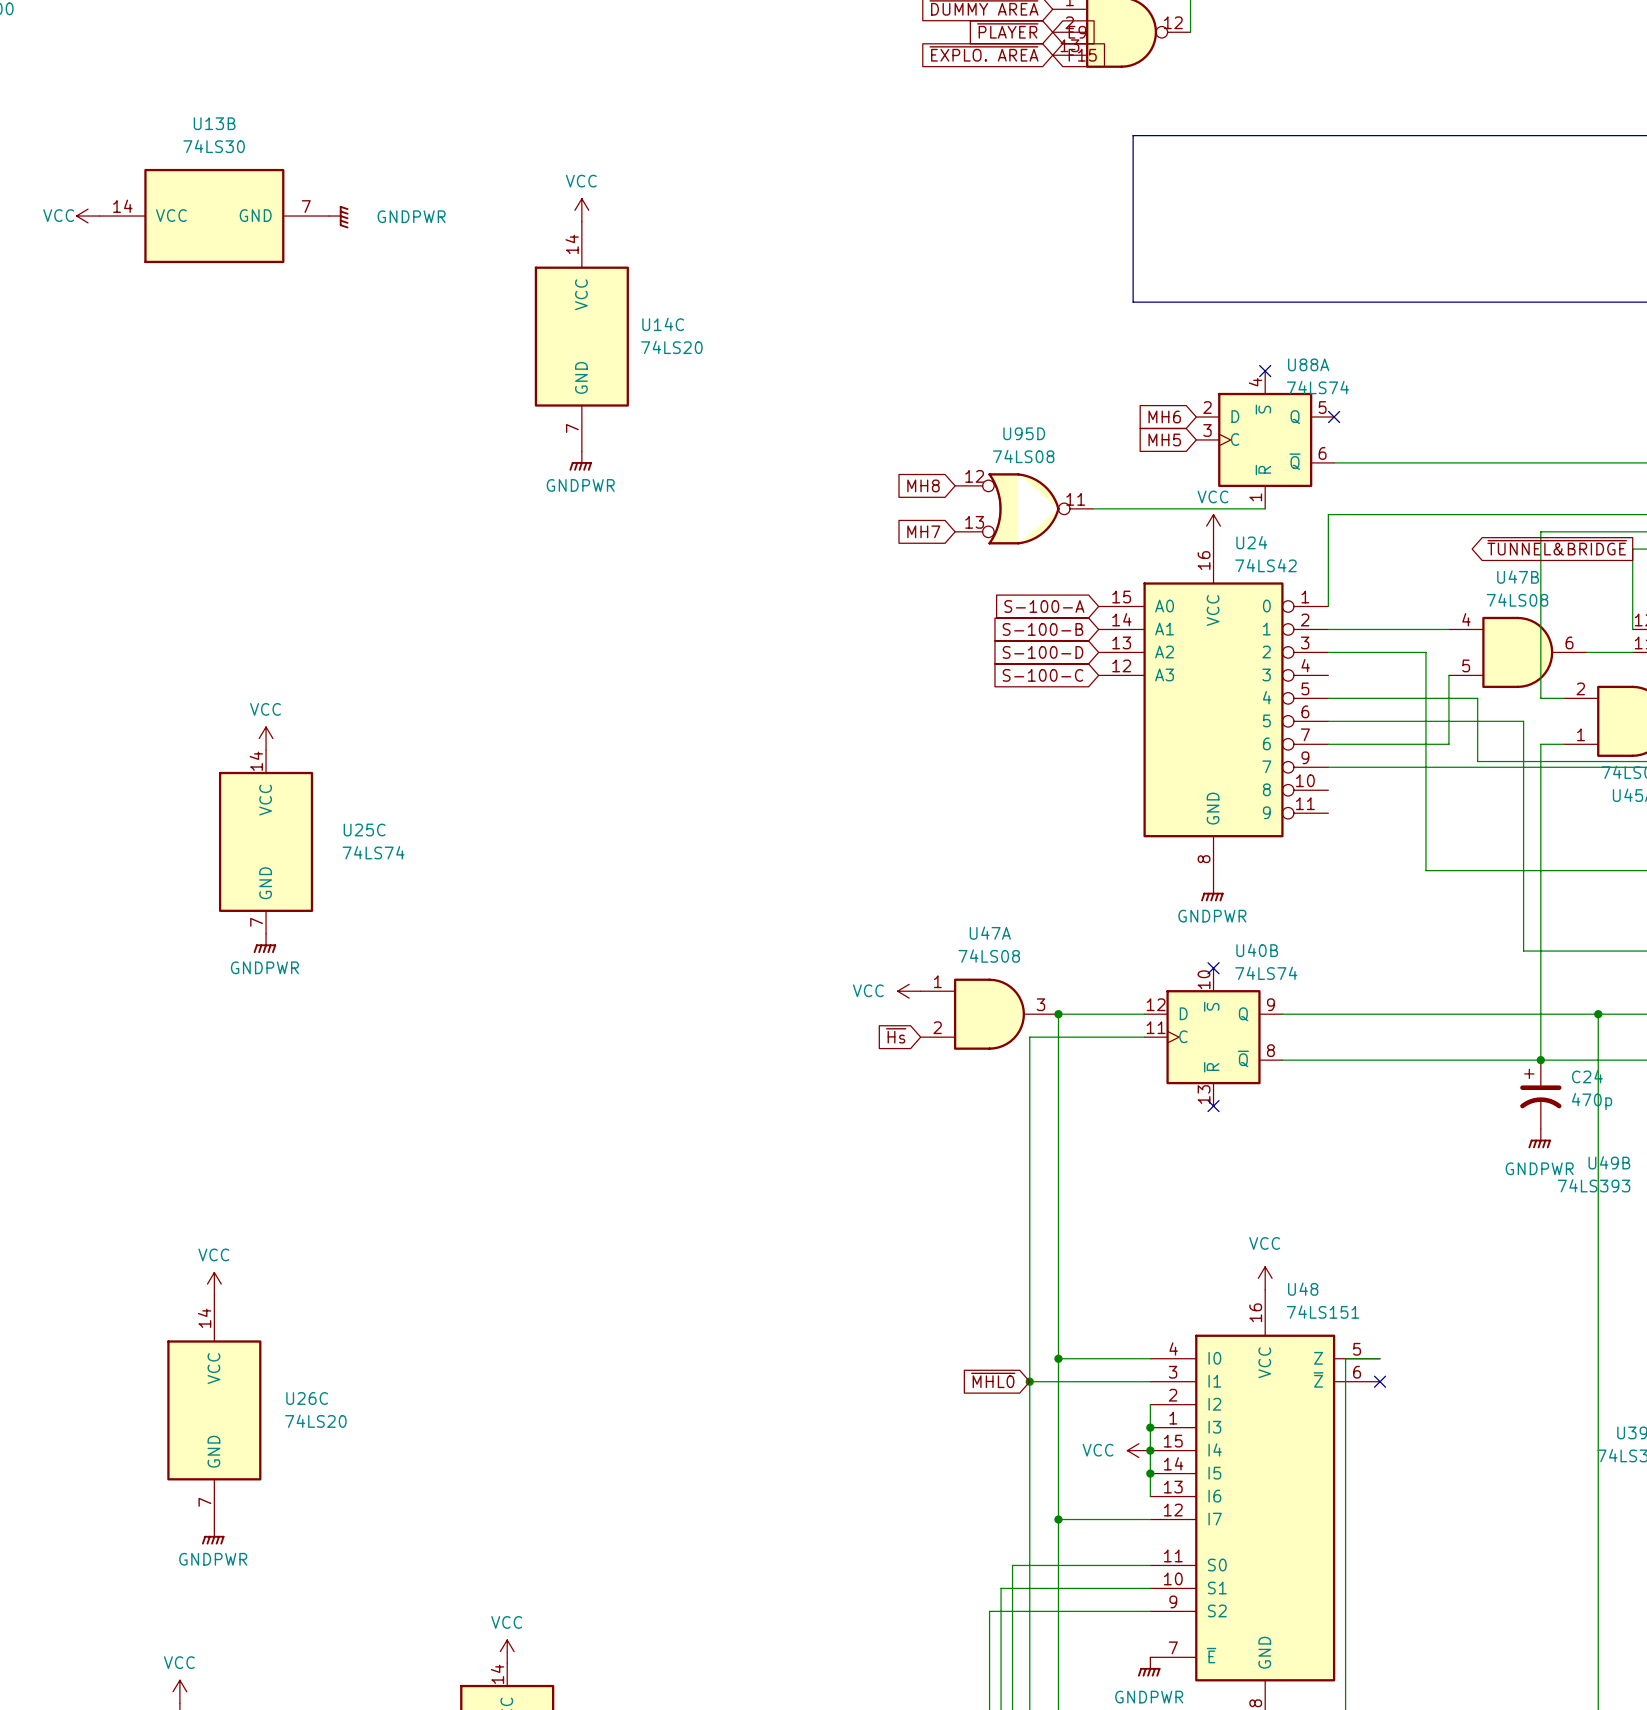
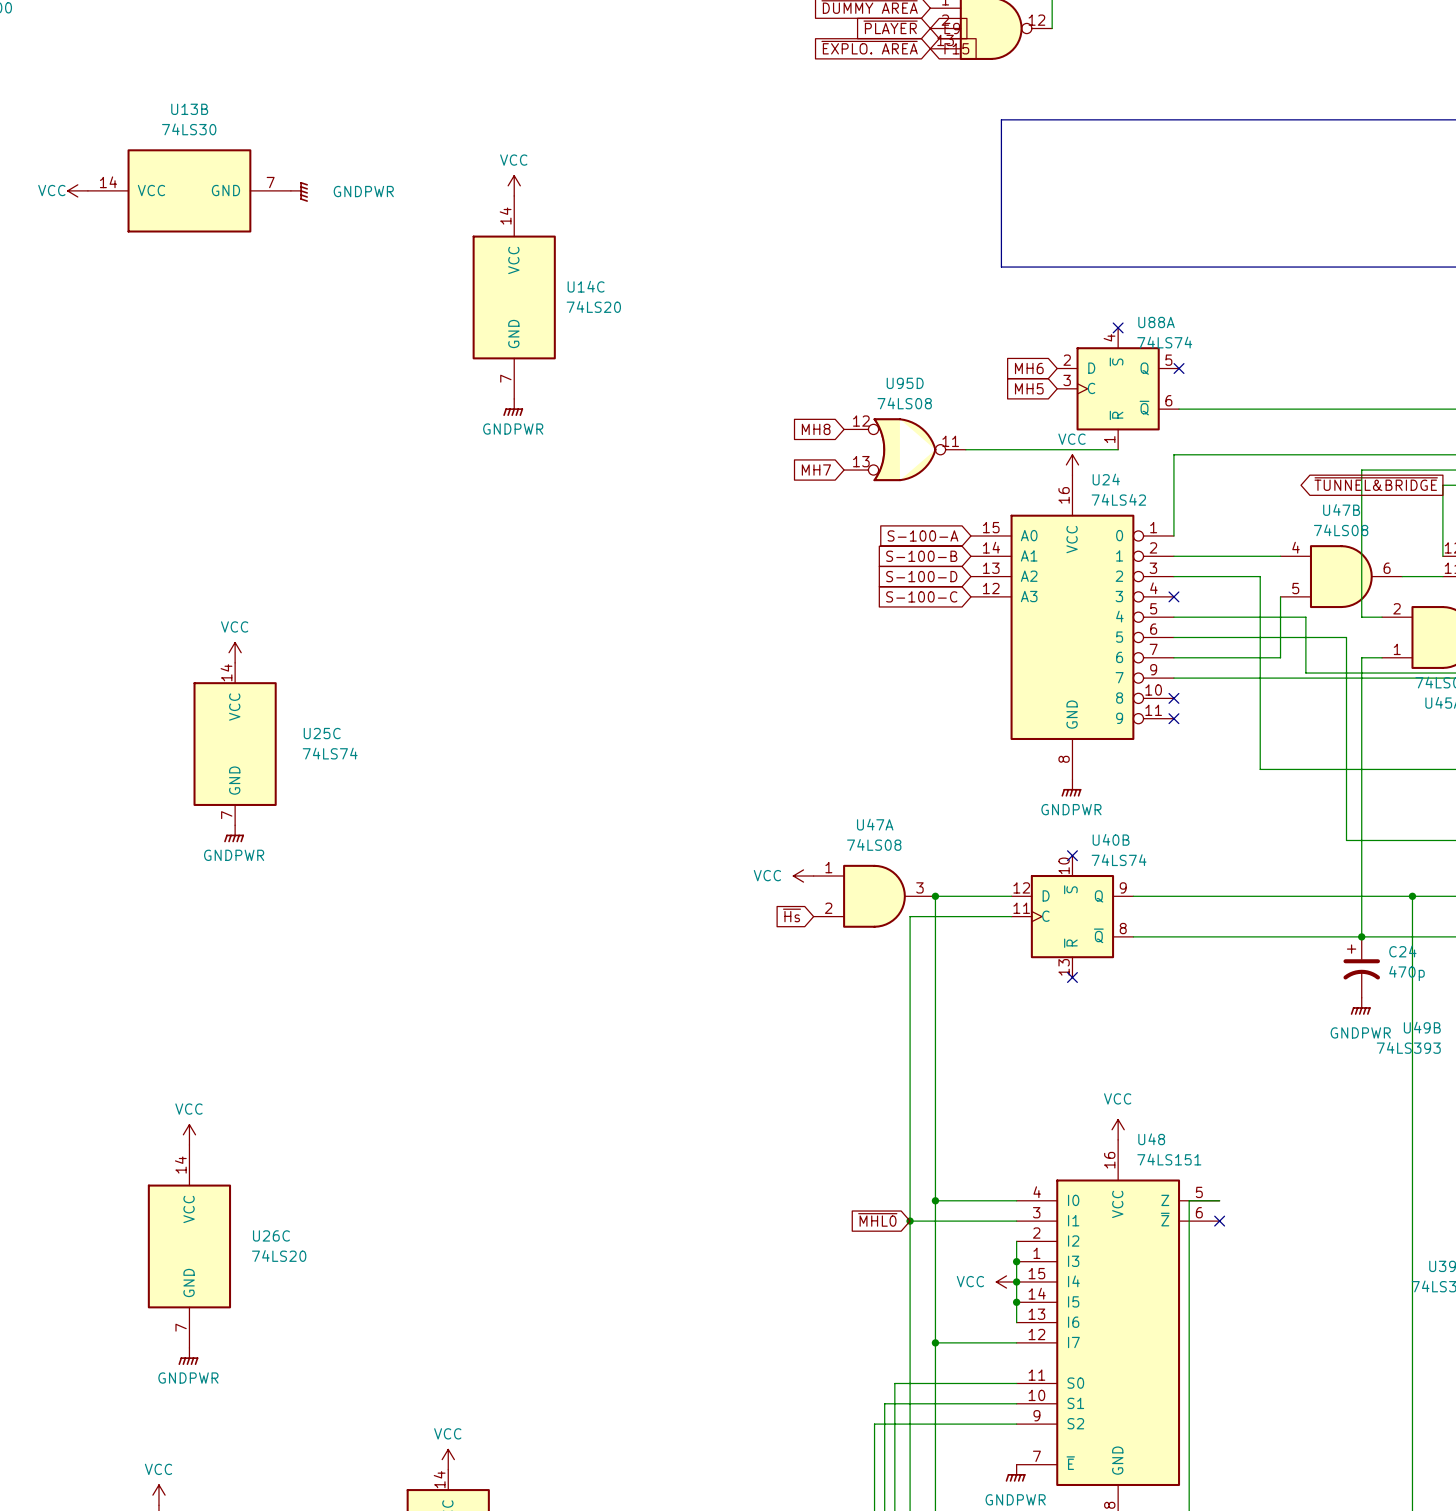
no-connect mark: none -> (1173, 596)
no-connect mark: none -> (1173, 698)
no-connect mark: none -> (1173, 718)

